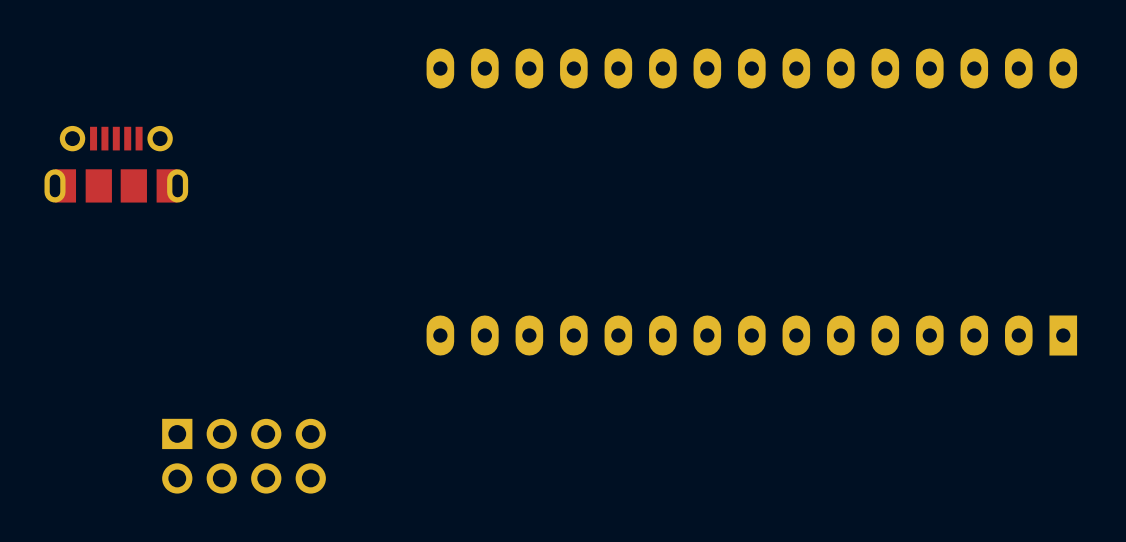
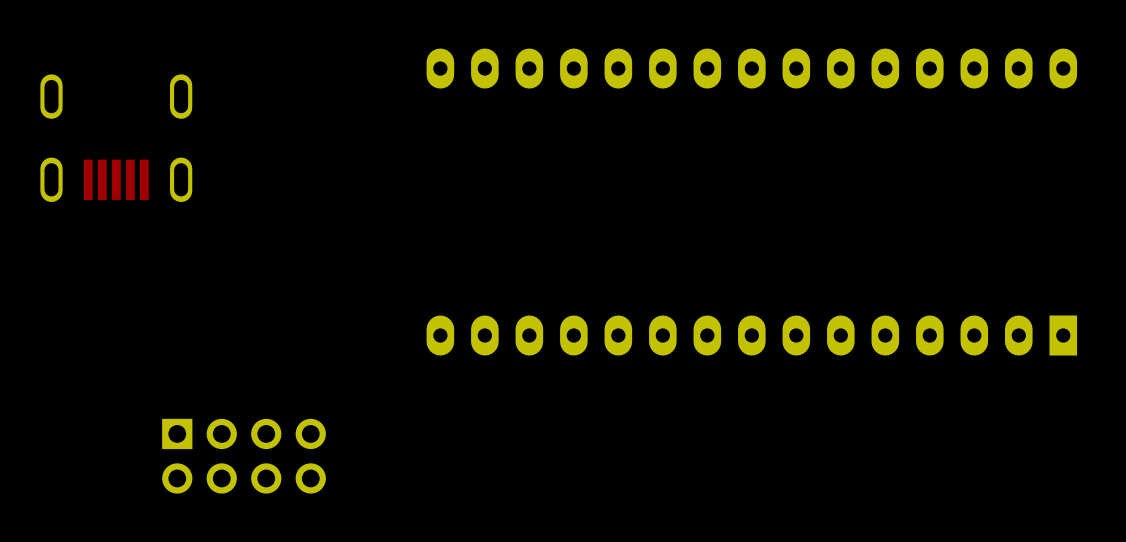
part: none -> (116, 138)
part: (116, 164) -> none

